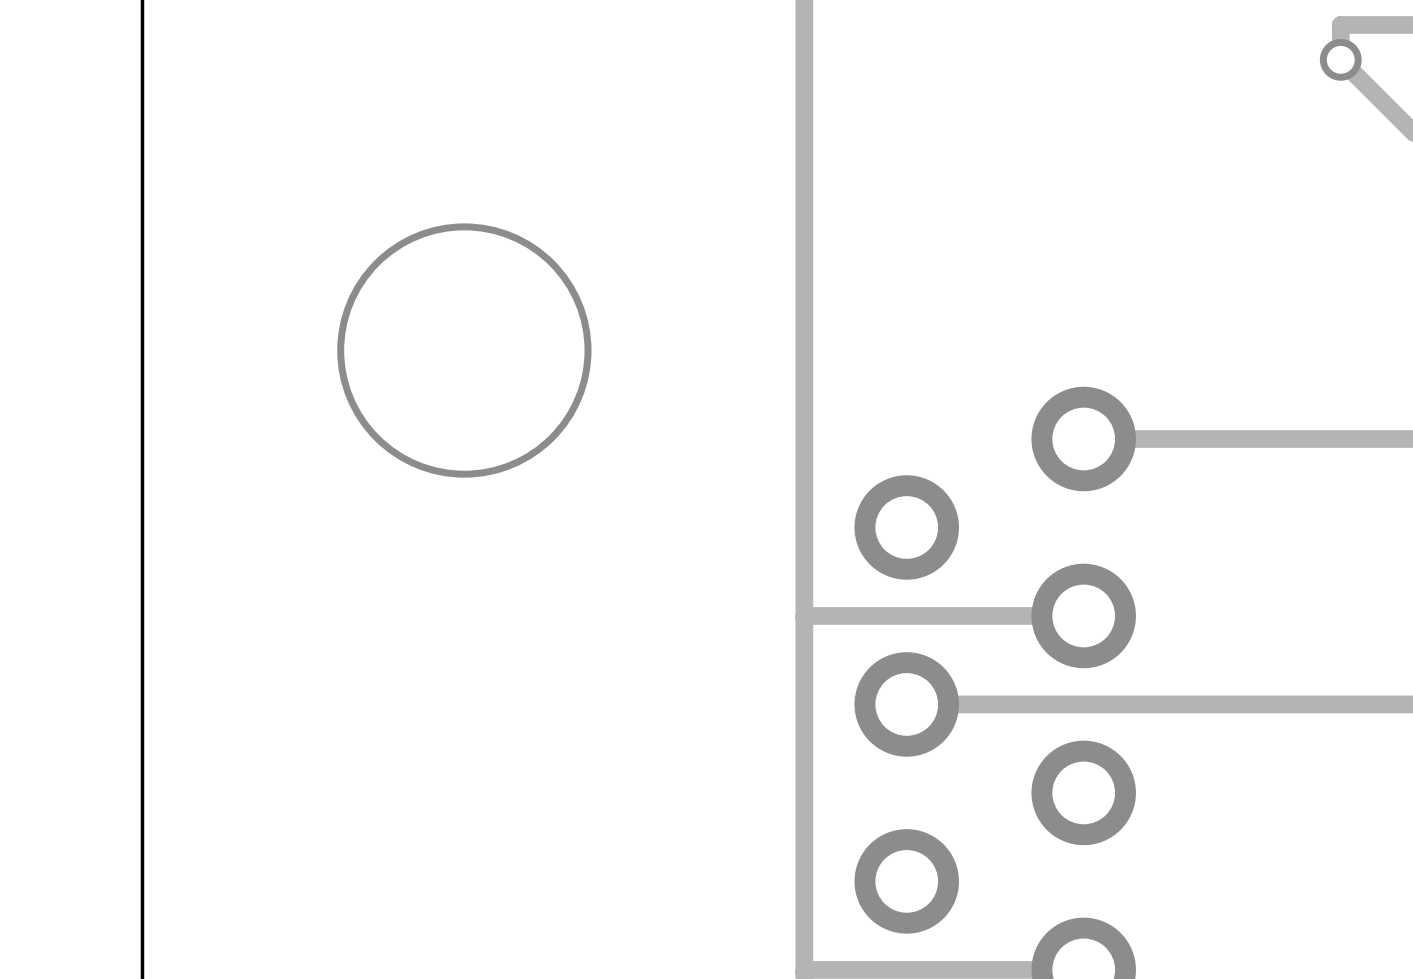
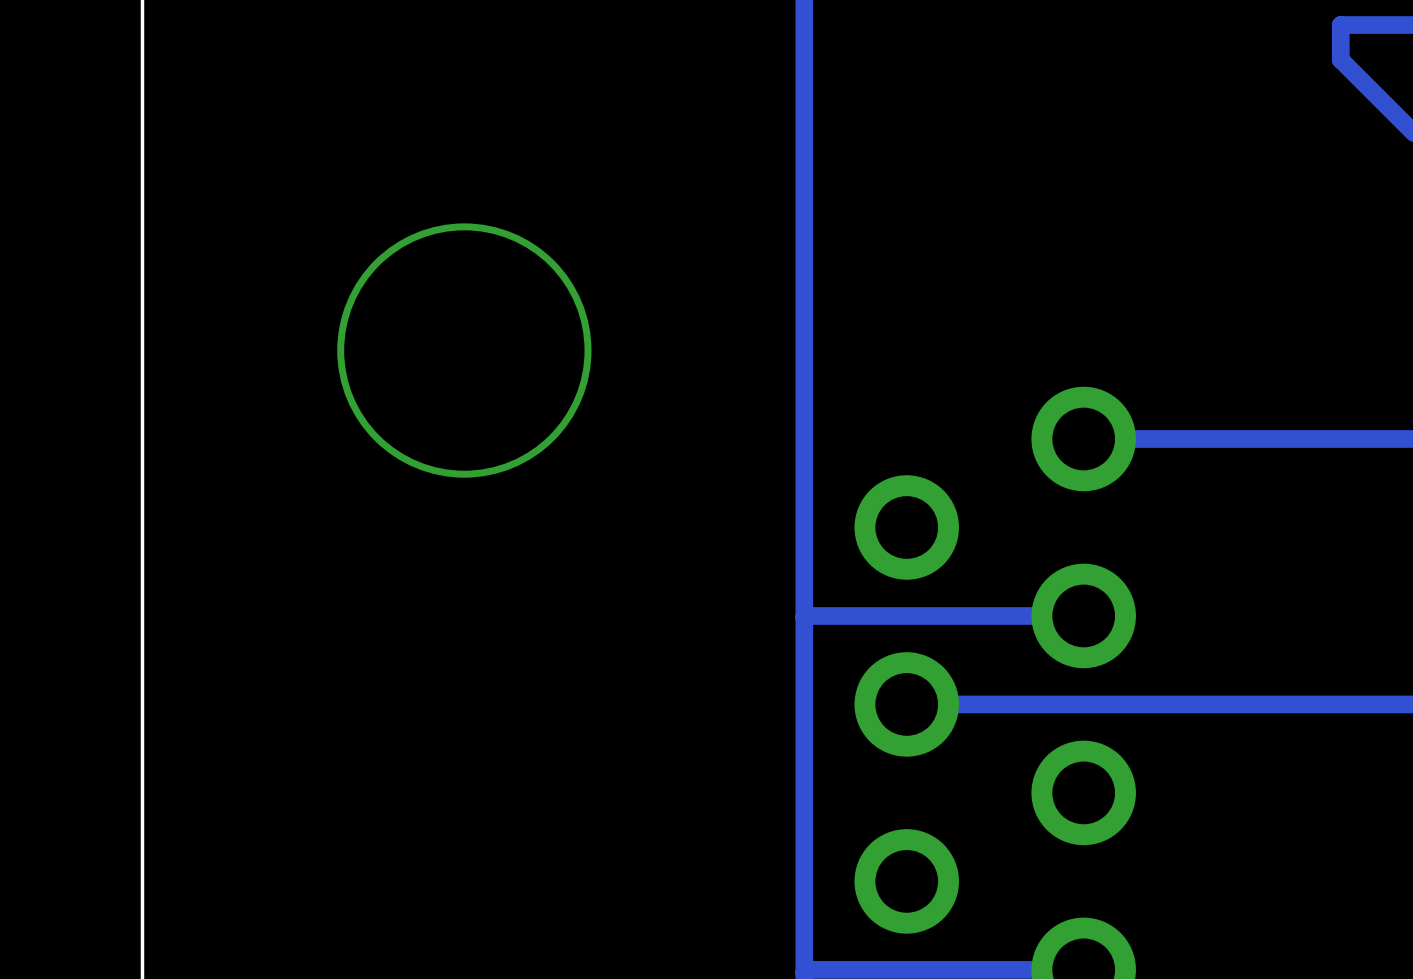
via: (1340, 59) -> none

